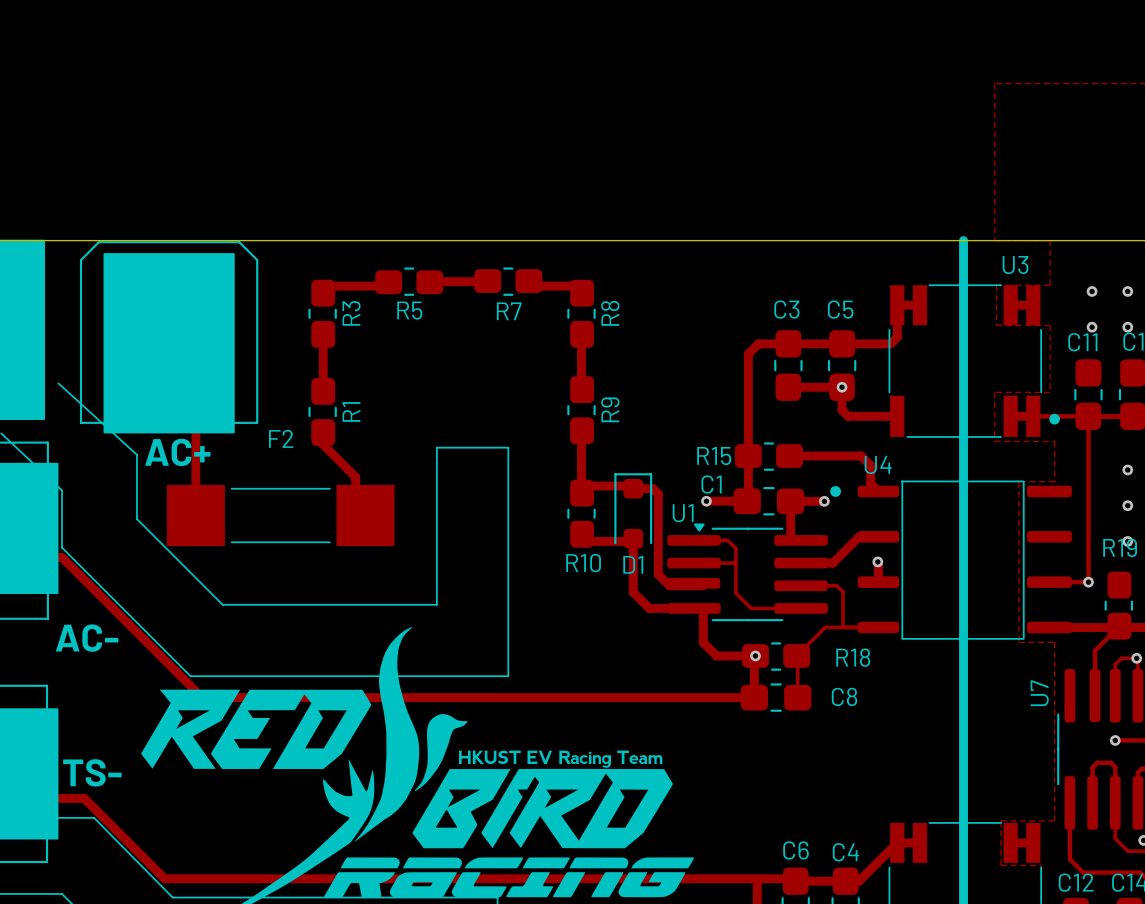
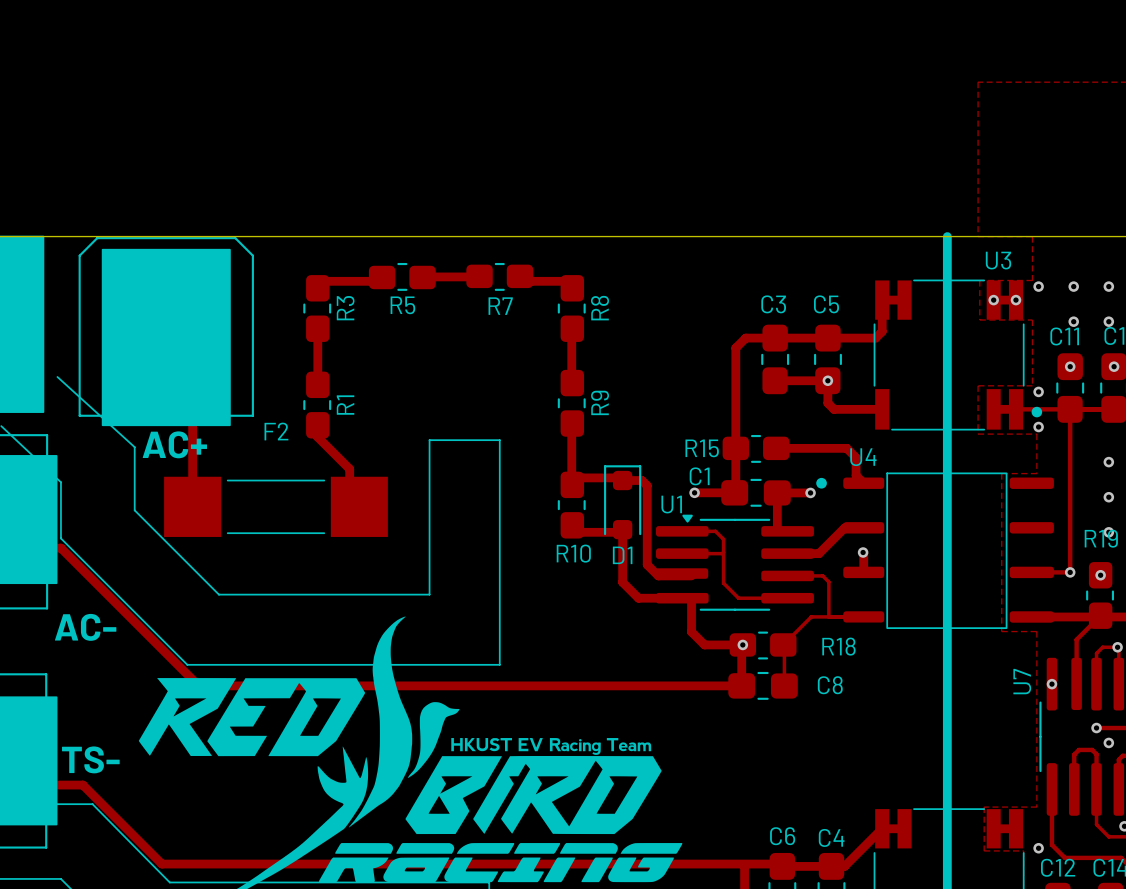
via: none -> (1038, 286)
via: none -> (993, 300)
via: none -> (1015, 300)
via: none -> (1070, 366)
via: none -> (1114, 366)
via: none -> (1038, 391)
via: none -> (1038, 427)
via: none -> (1100, 575)
via: none -> (1051, 684)
via: none -> (1108, 742)
via: none -> (1038, 848)

